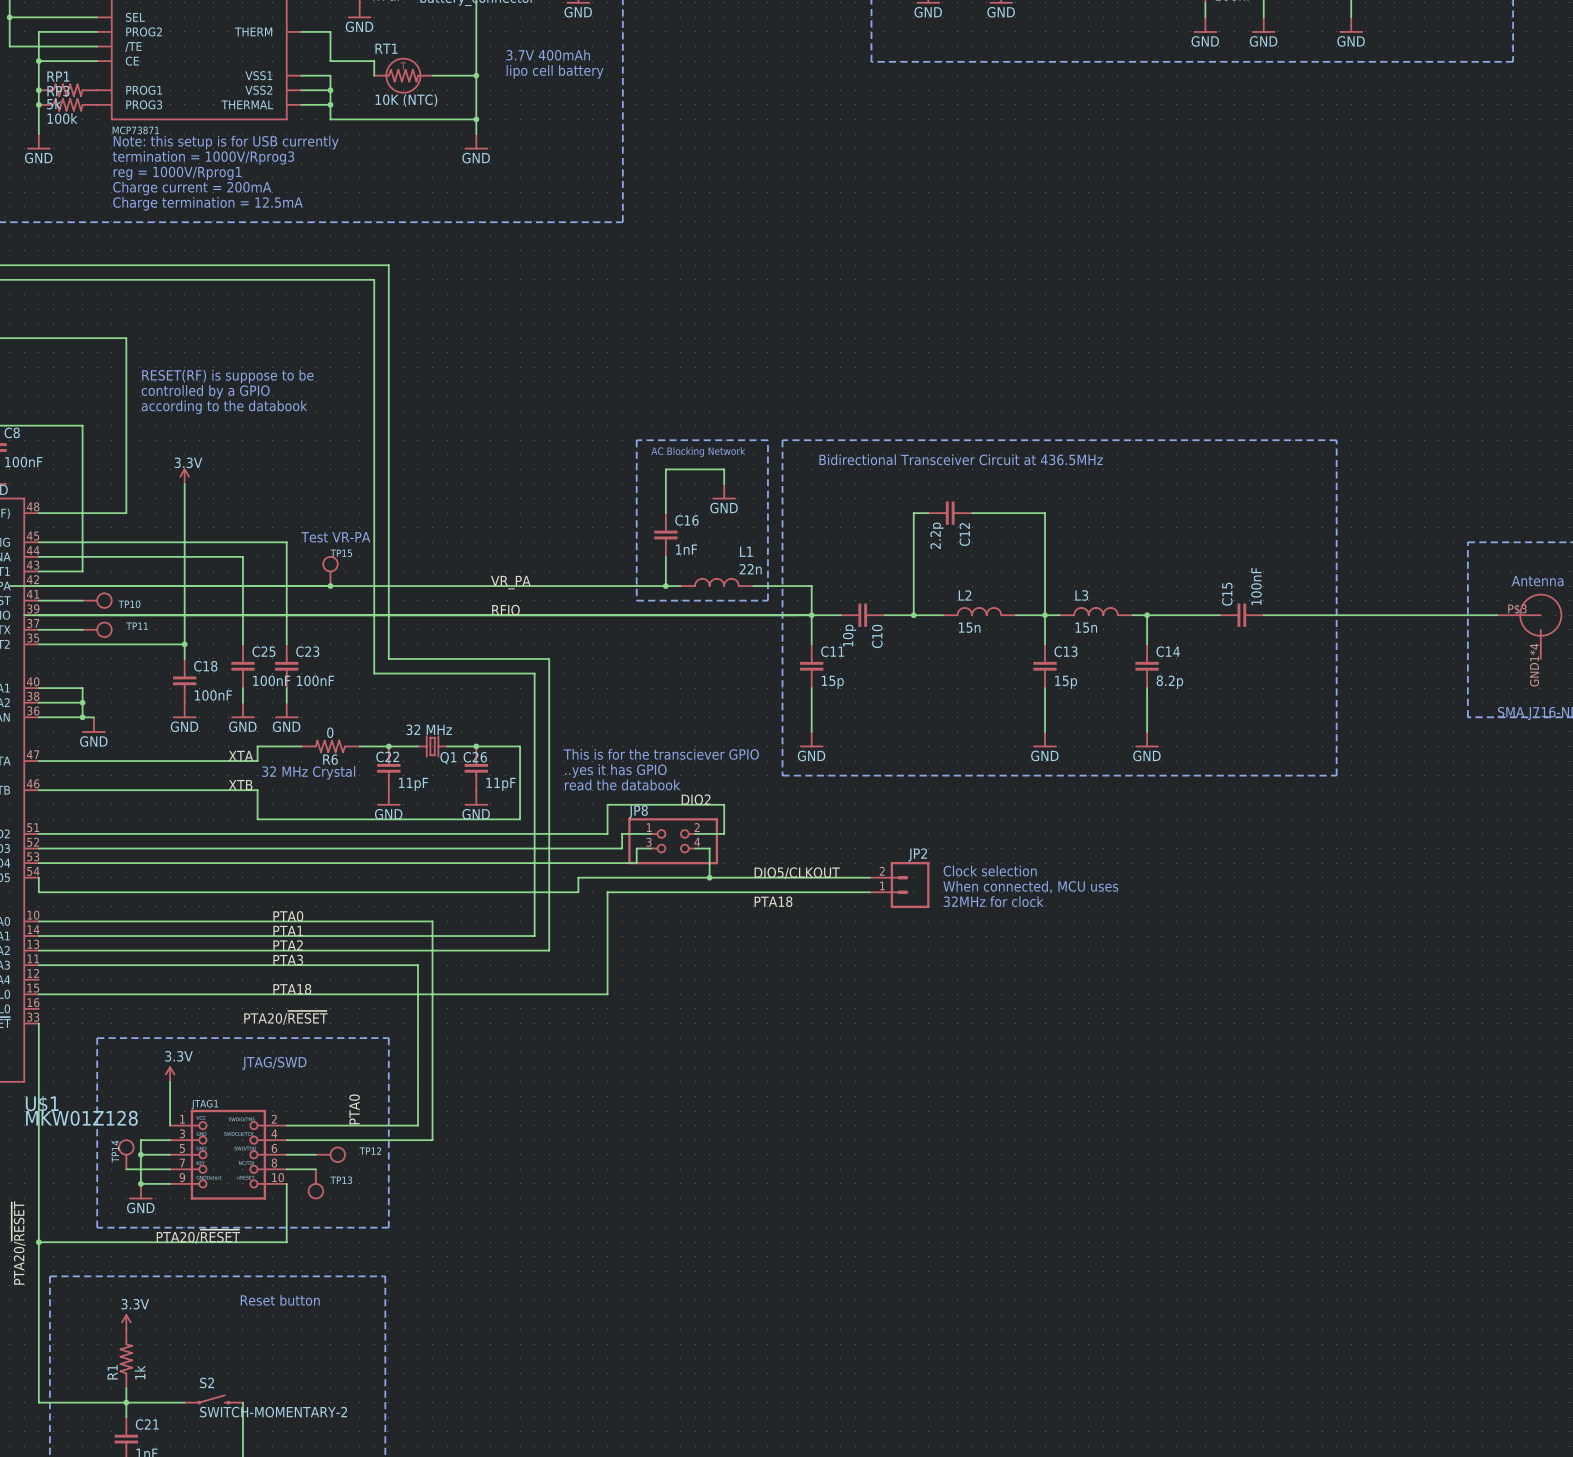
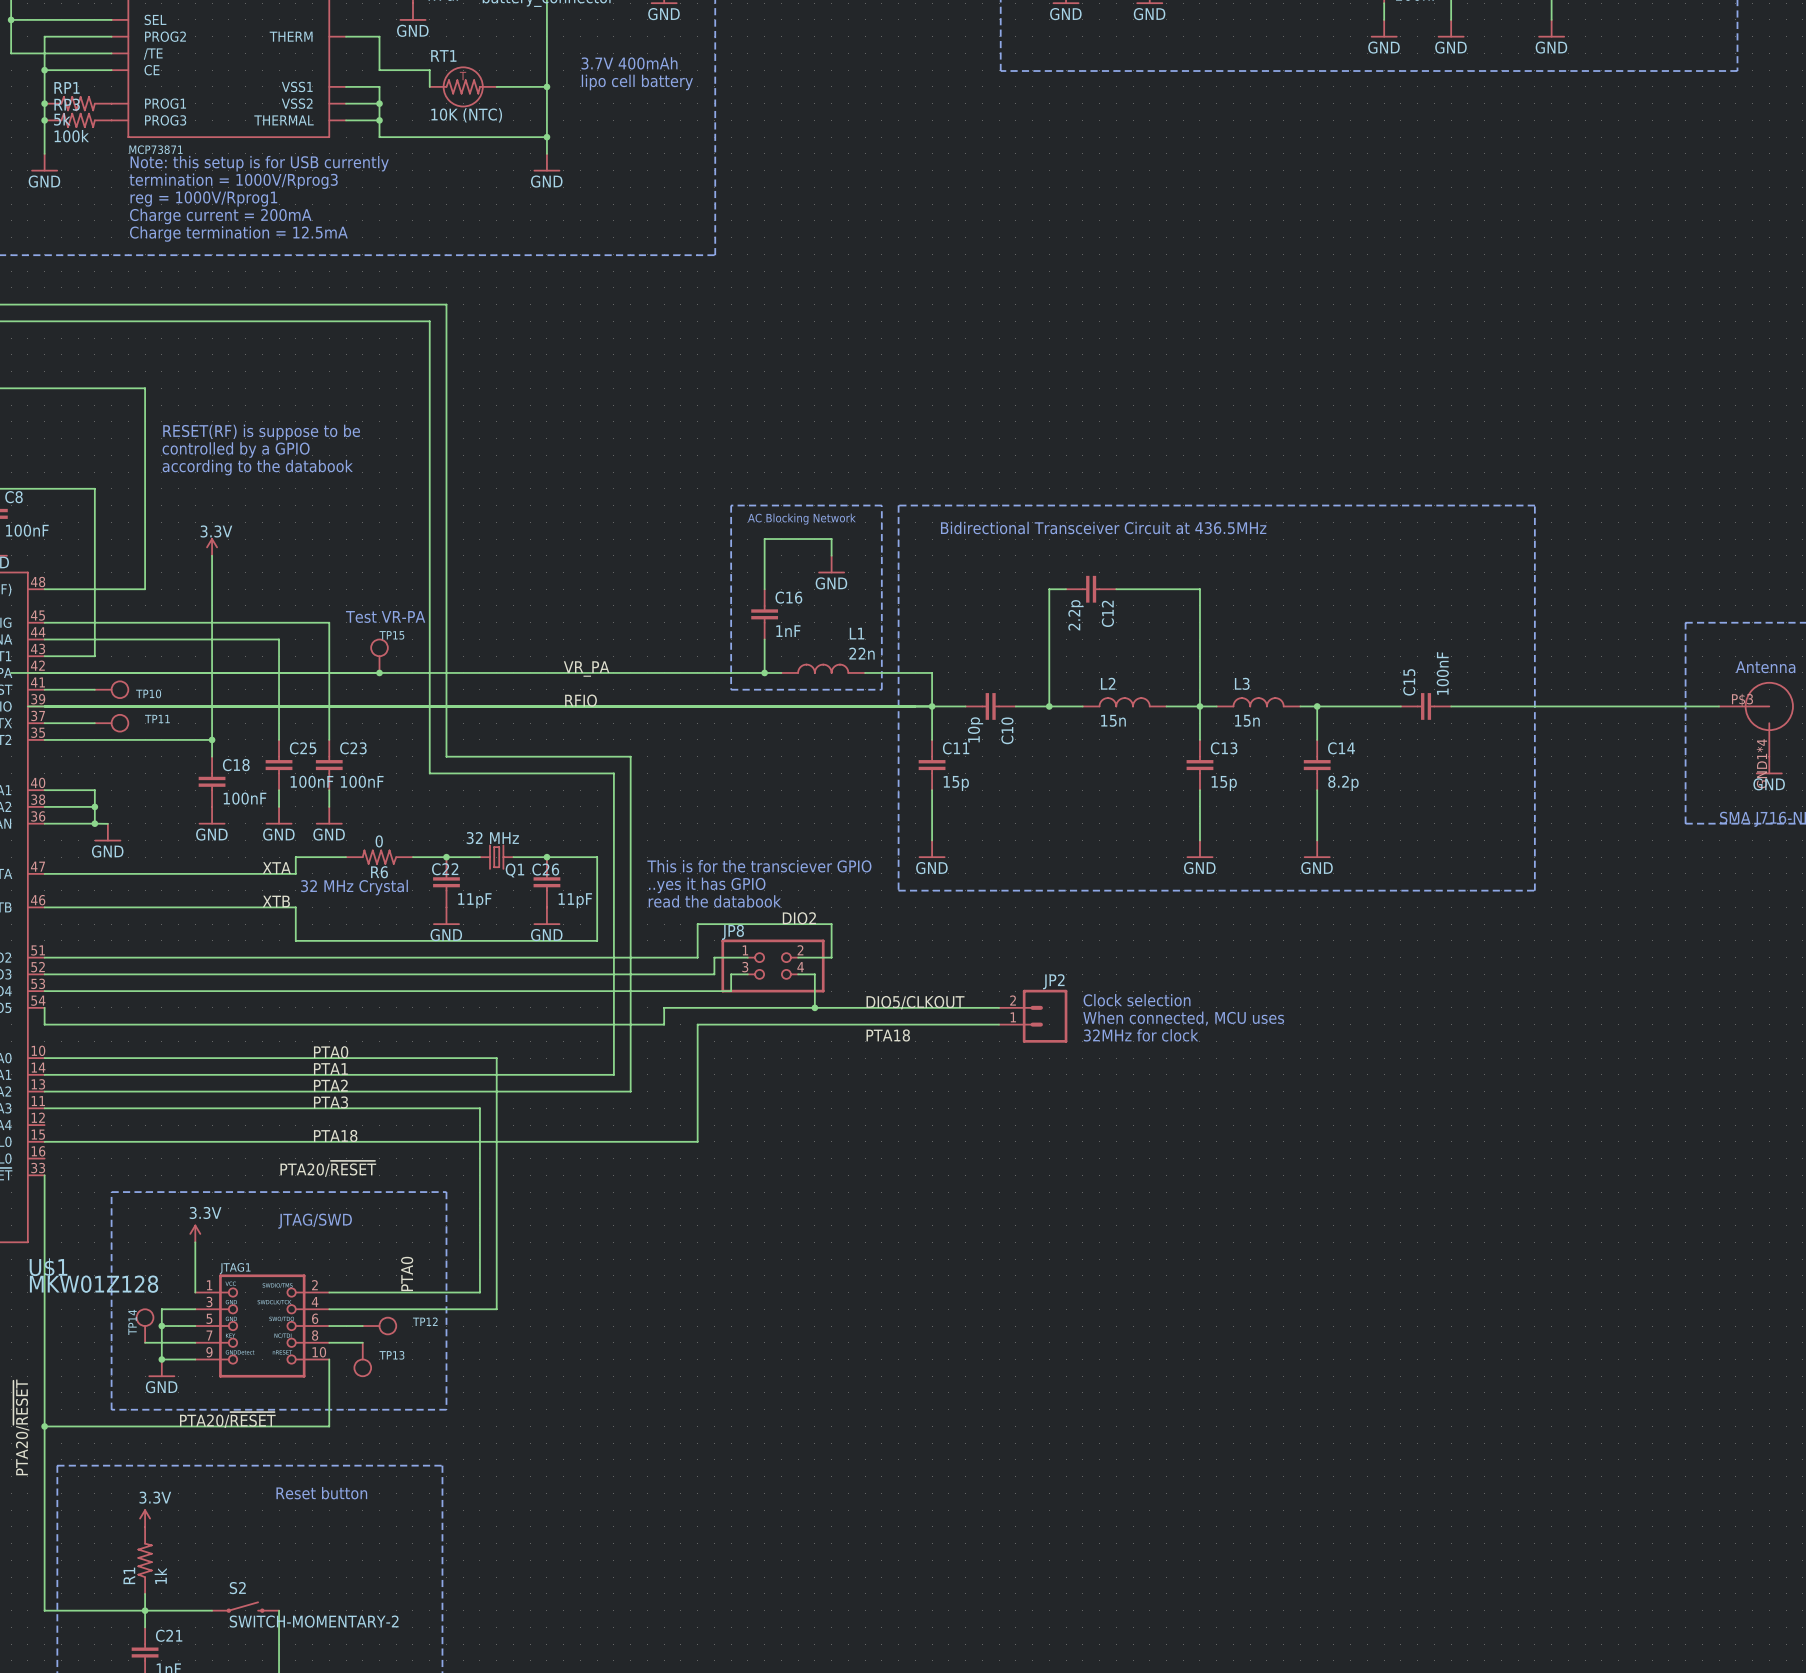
power symbol: none -> GND (1769, 765)

